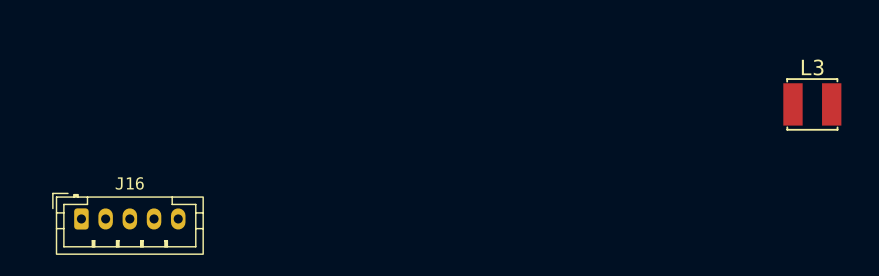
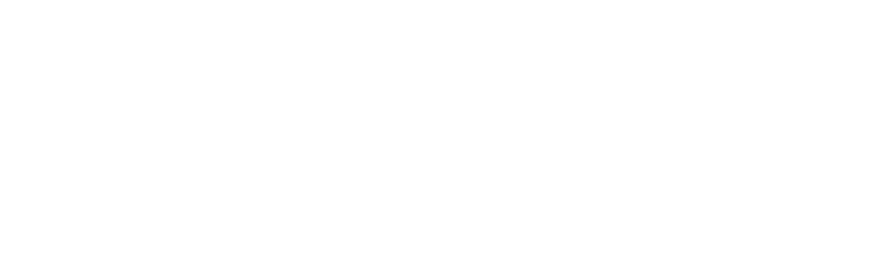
L3: (812, 104) -> none
J16: (128, 223) -> none

